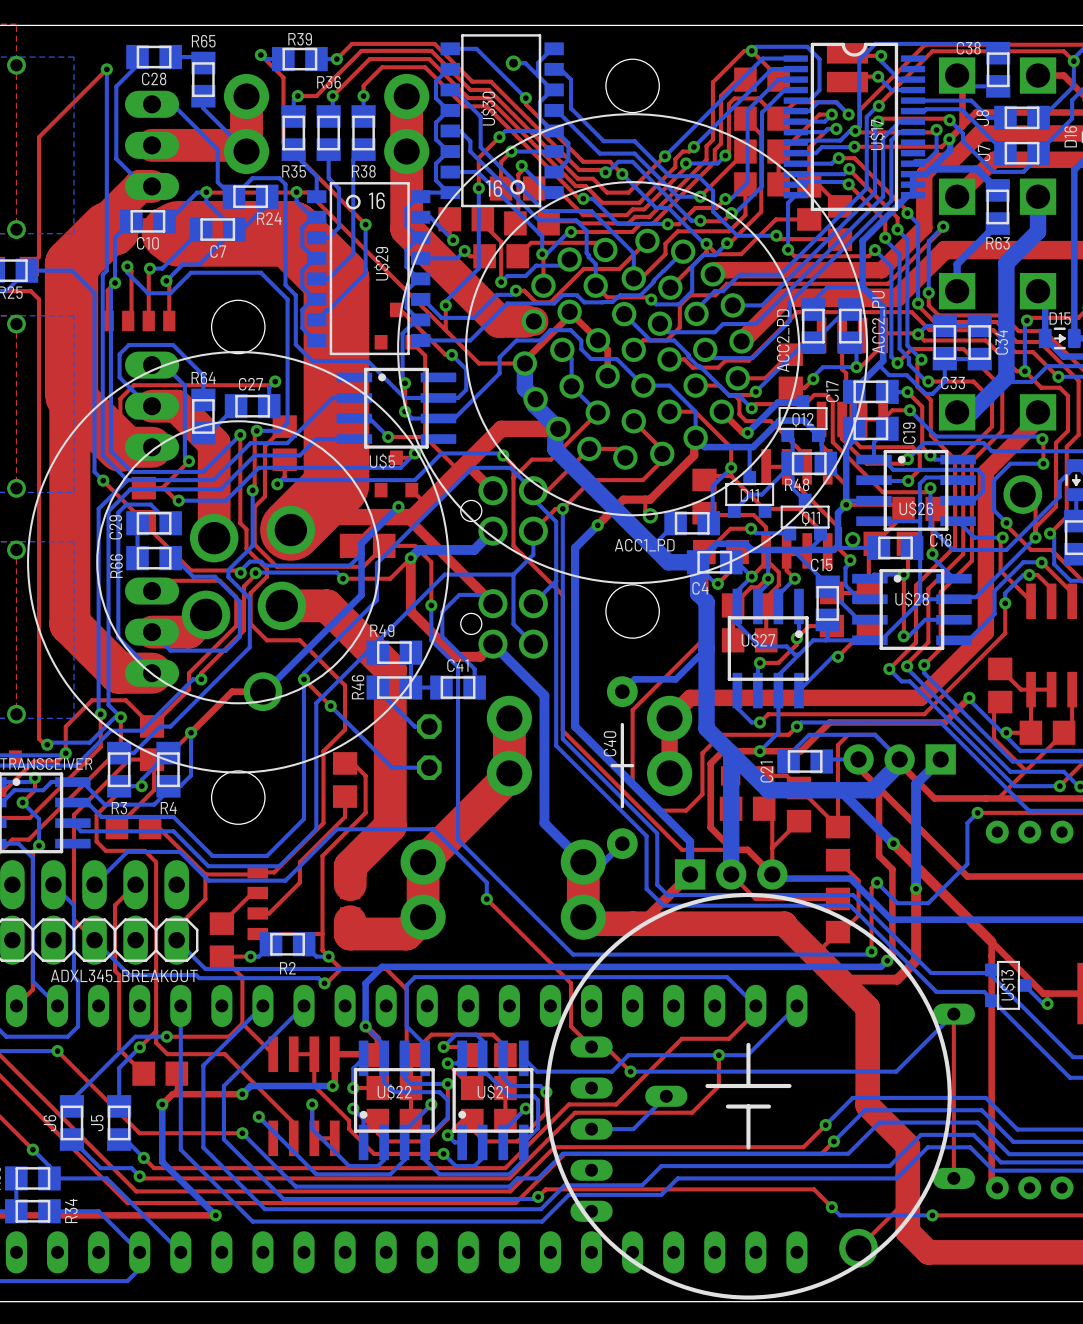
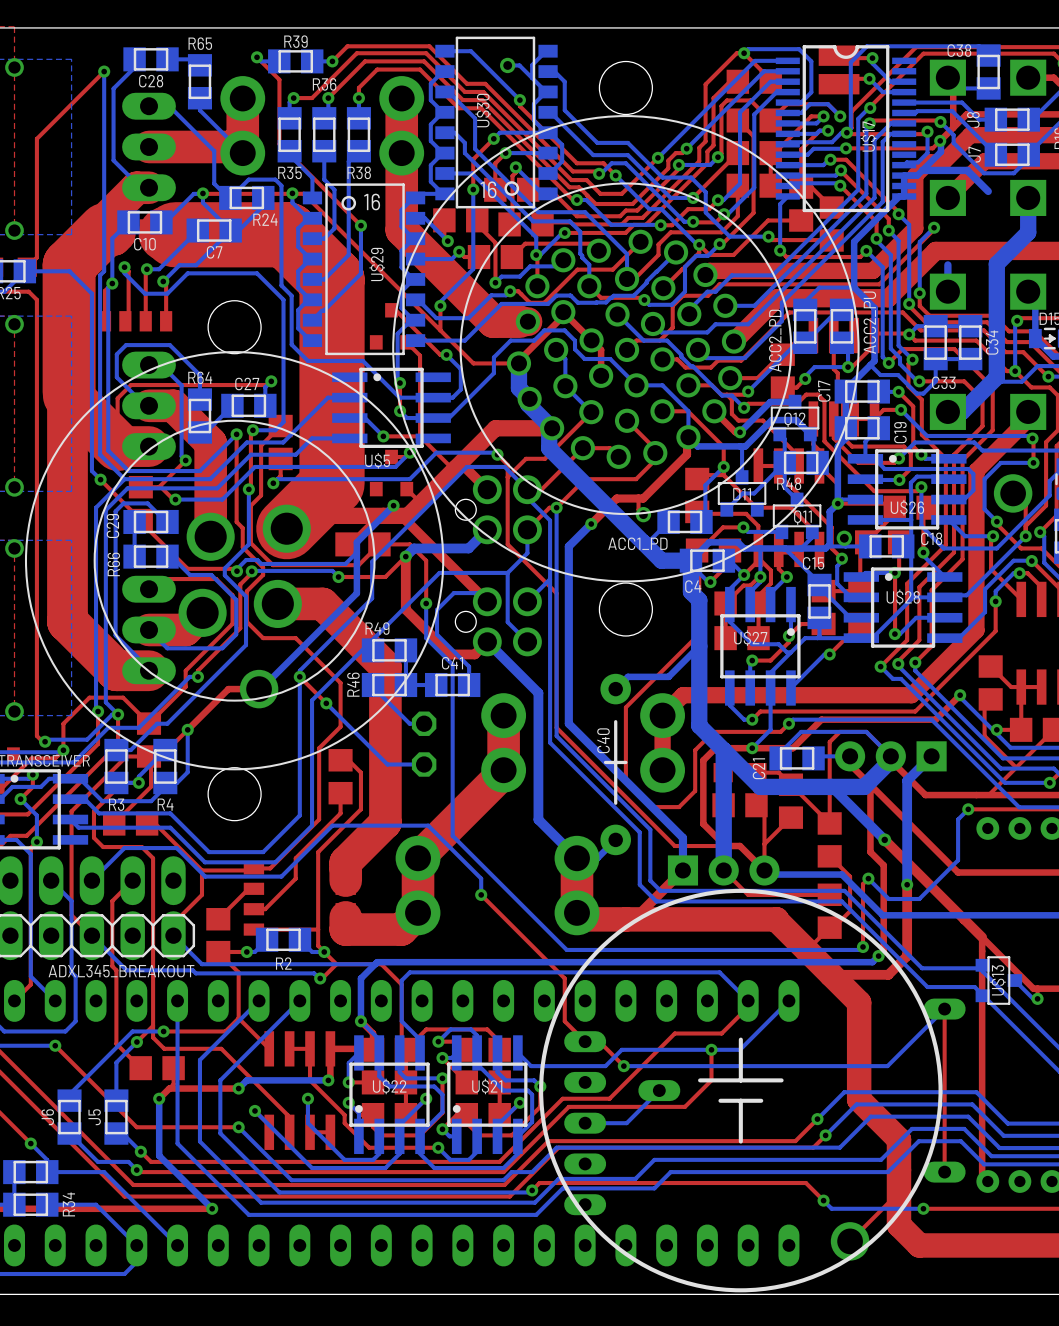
R63: (997, 206) -> none
bottom track: (997, 223) (957, 264) -> none

